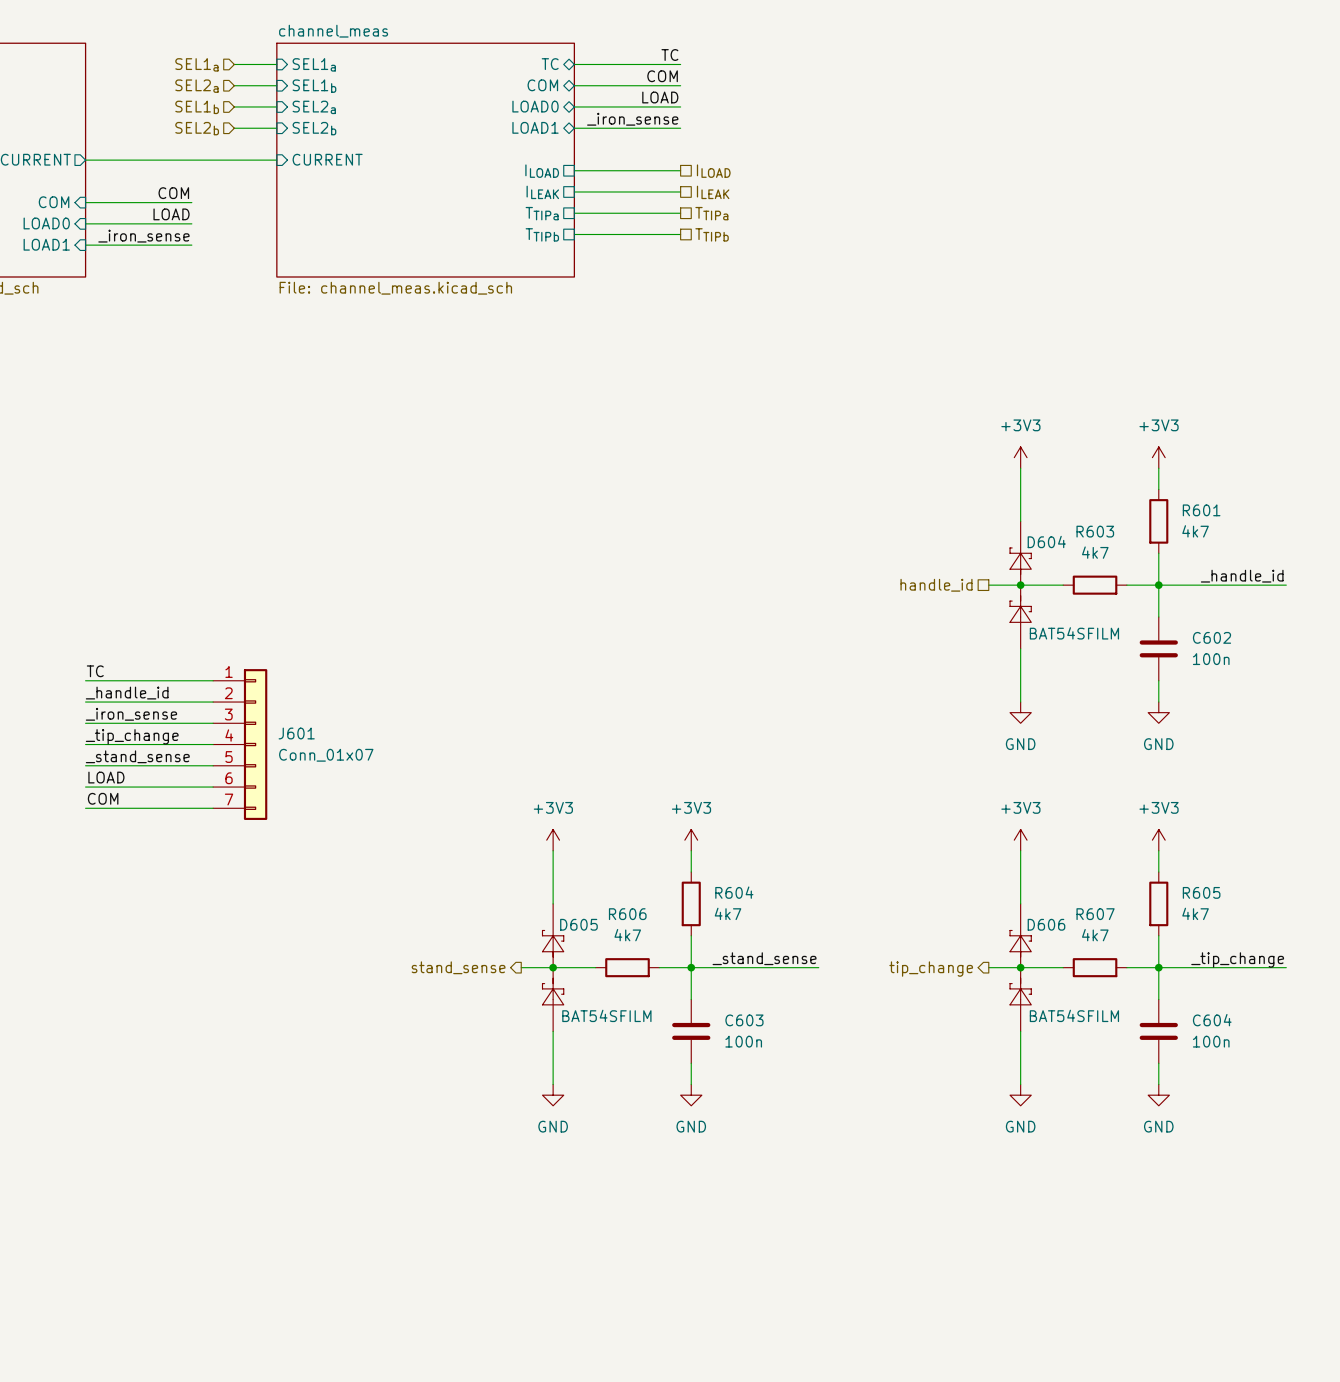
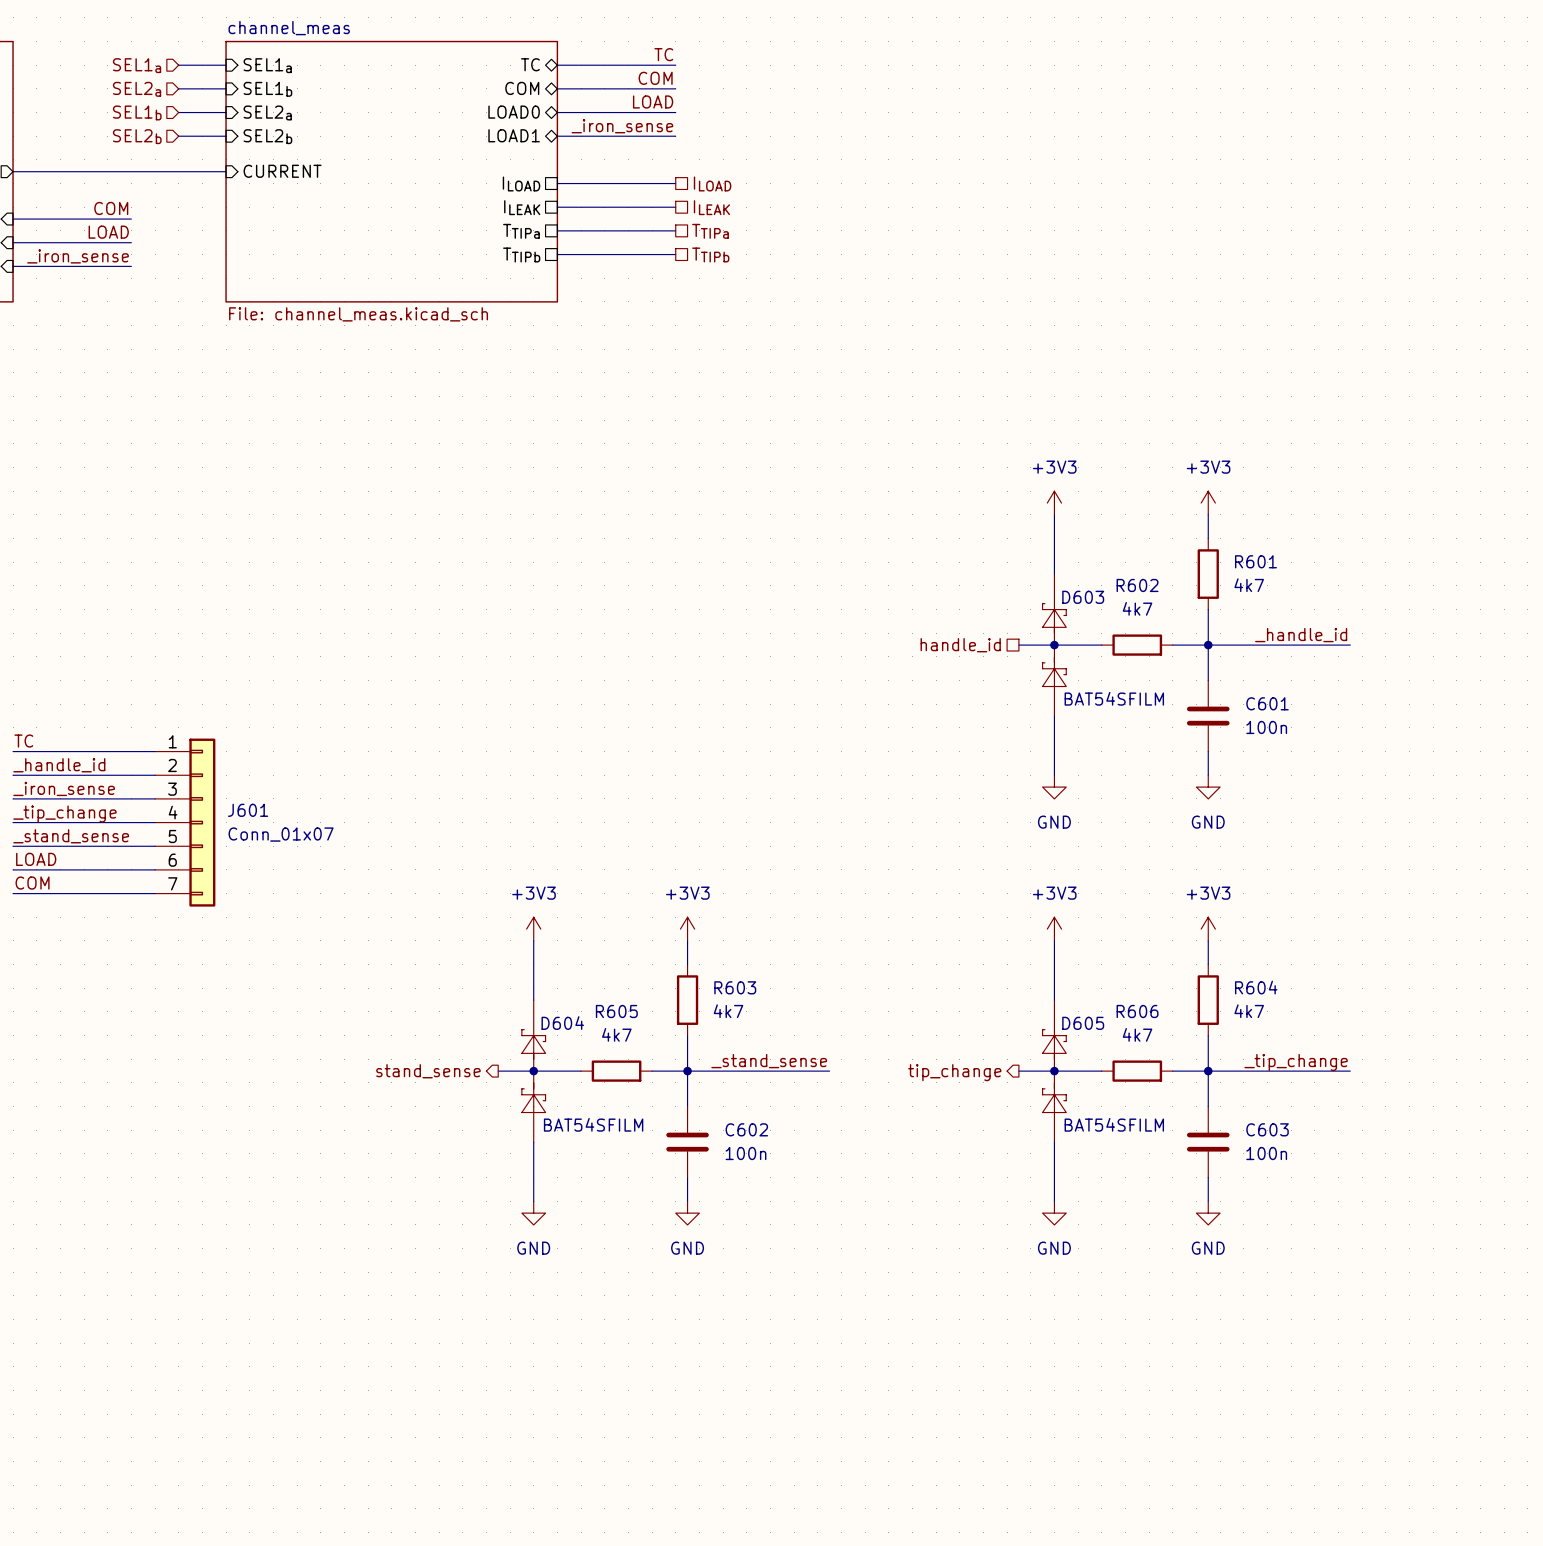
R603 name: R603 (1095, 531) -> R602 (1137, 585)
D604 name: D604 (1046, 541) -> D603 (1083, 597)
C602 name: C602 (1211, 637) -> C601 (1267, 703)
R604 name: R604 (734, 892) -> R603 (735, 987)
R605 name: R605 (1201, 892) -> R604 (1256, 987)
R606 name: R606 (627, 914) -> R605 (616, 1011)
R607 name: R607 (1095, 914) -> R606 (1137, 1011)
D605 name: D605 (578, 924) -> D604 (562, 1023)
D606 name: D606 (1046, 924) -> D605 (1083, 1023)
C603 name: C603 (744, 1020) -> C602 (746, 1129)
C604 name: C604 (1212, 1020) -> C603 (1267, 1129)

